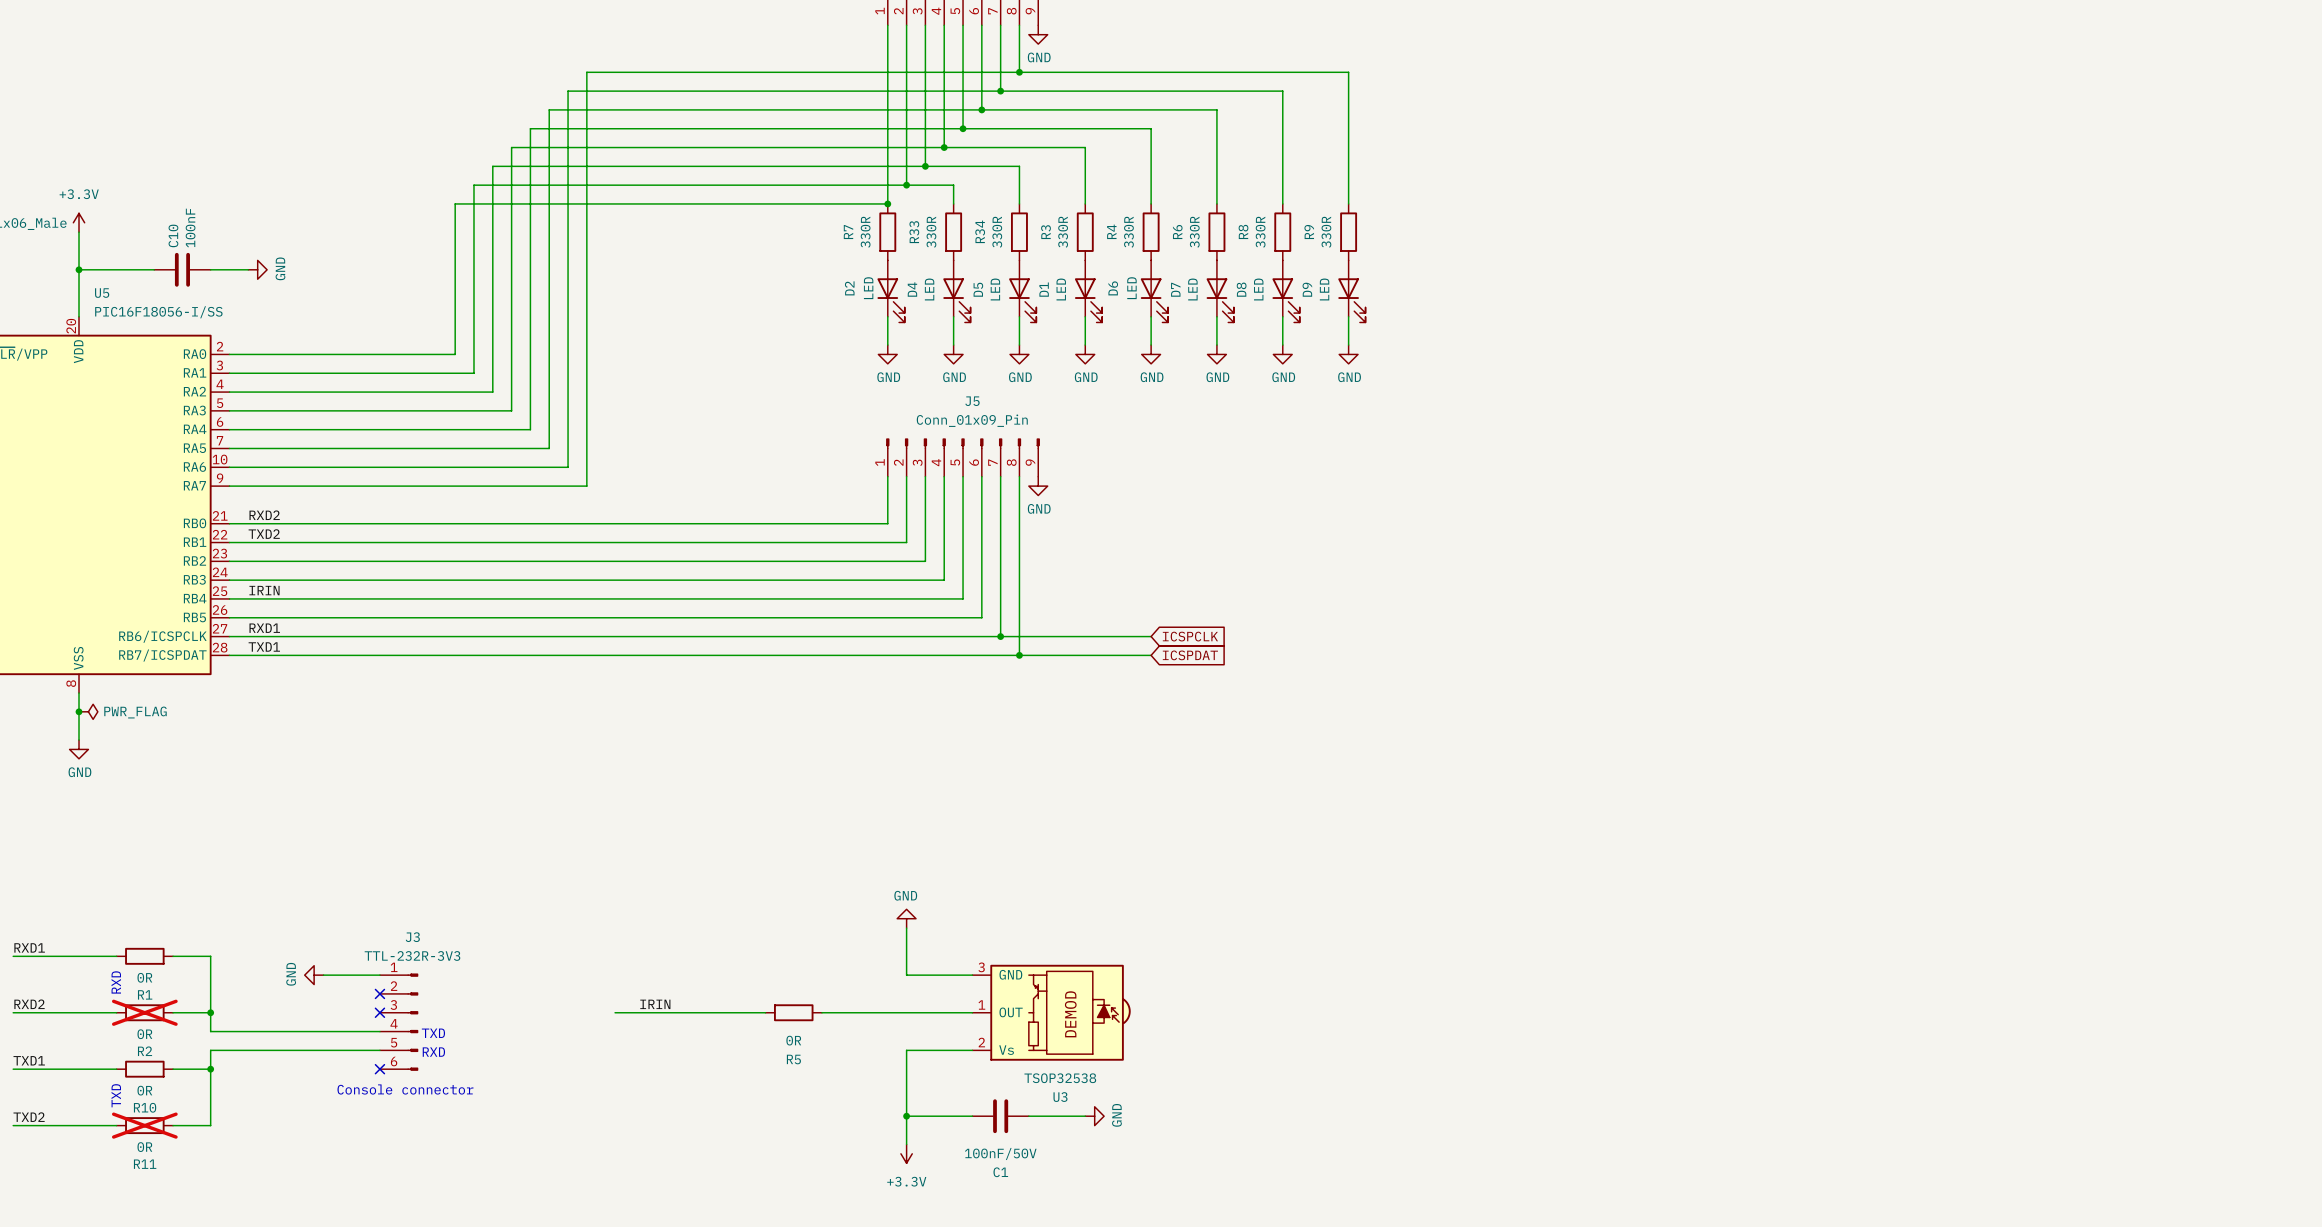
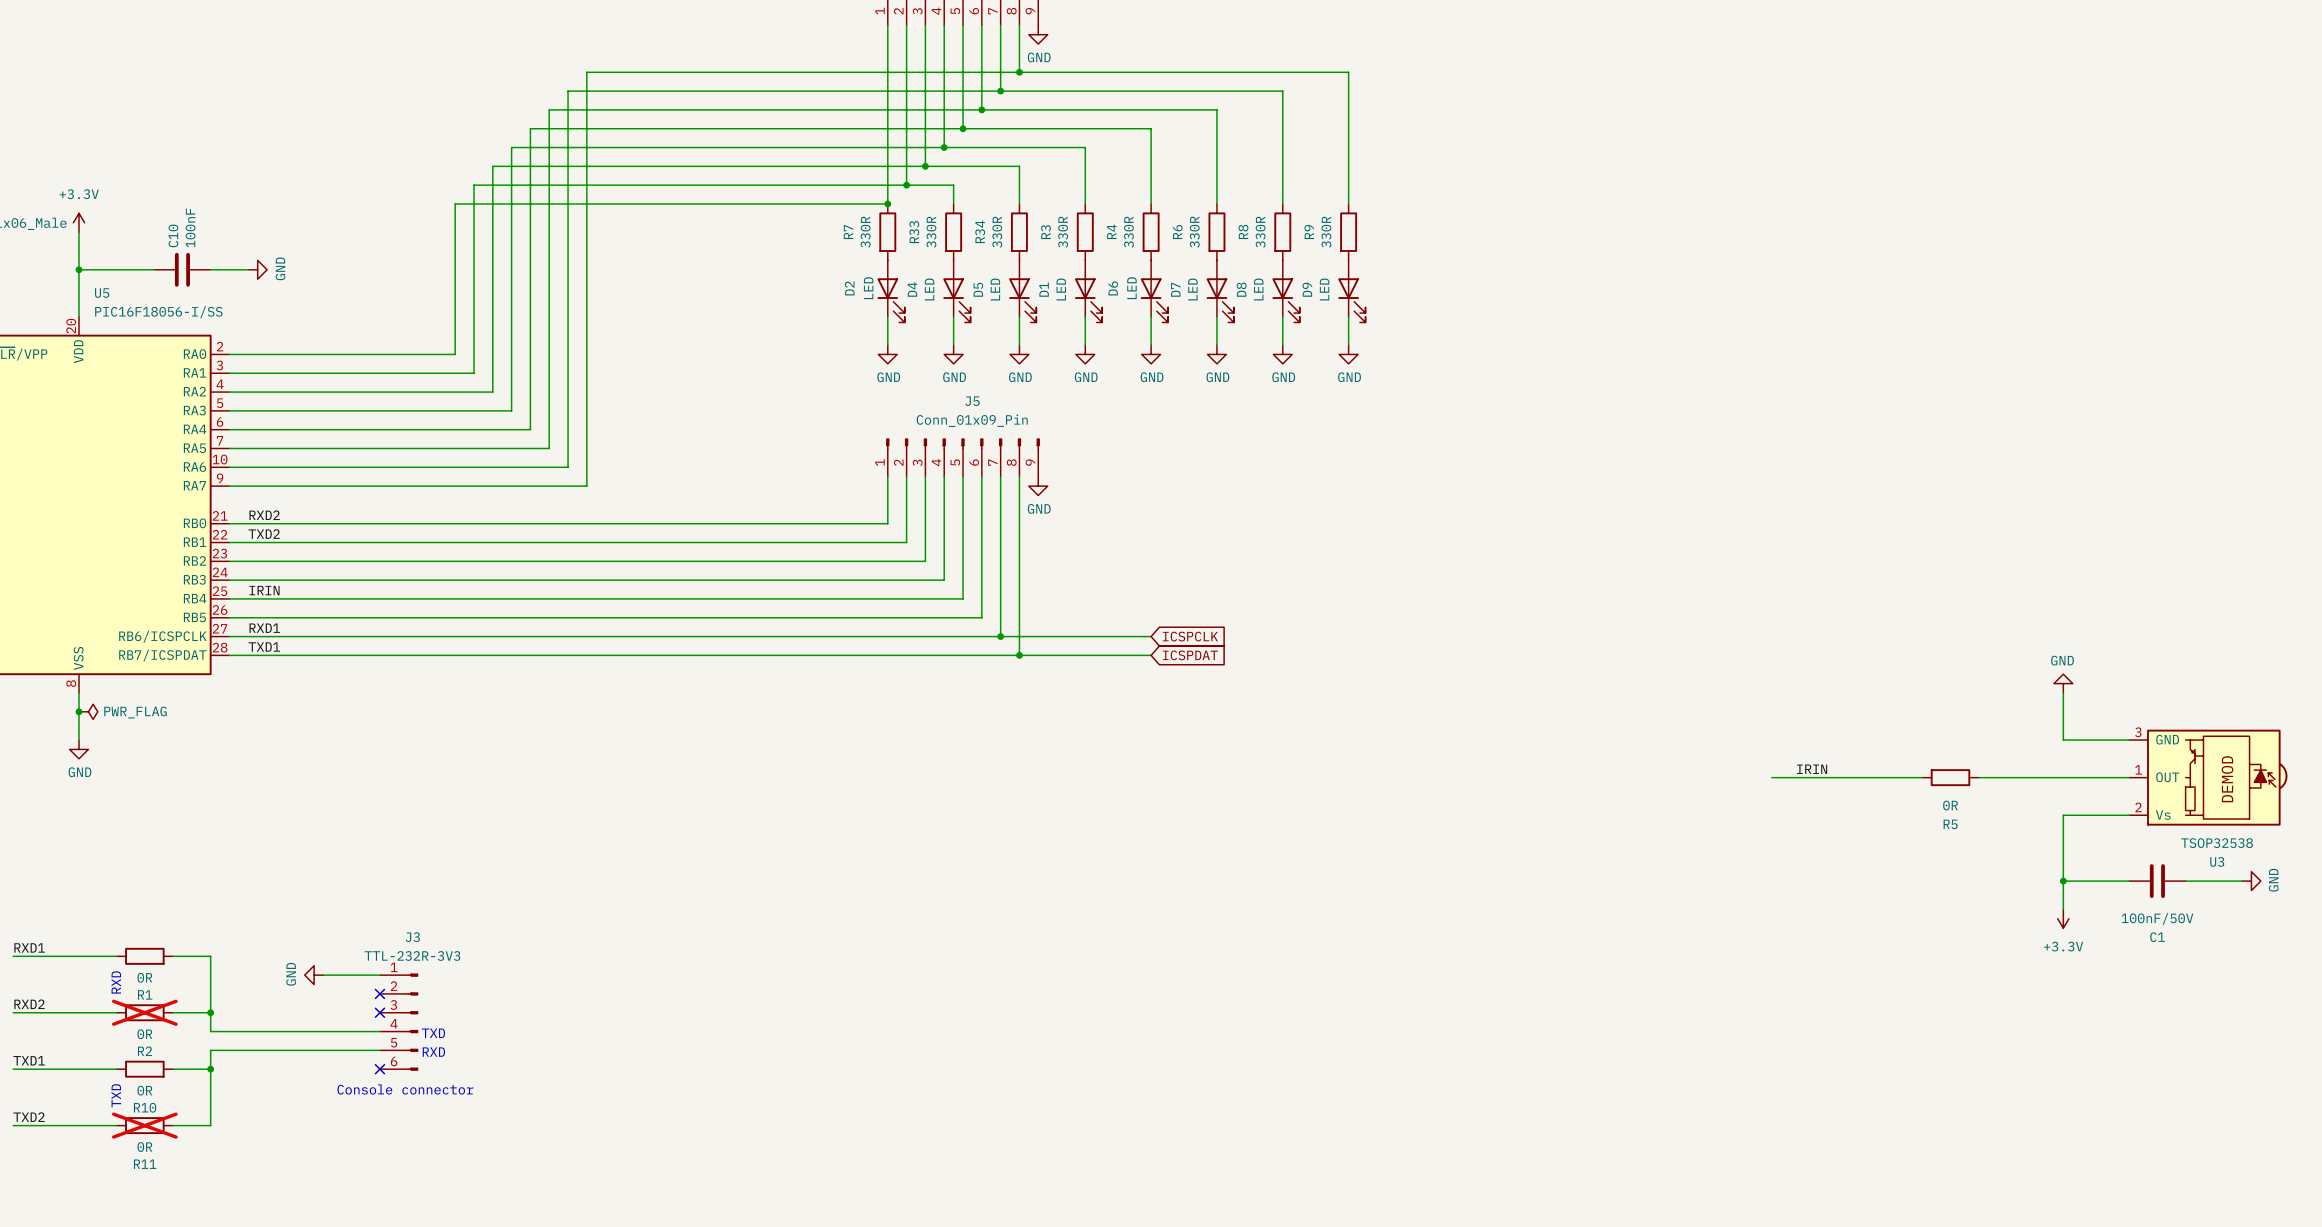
power symbol: none -> GND (2063, 683)
wire: none -> (2063, 693) (2063, 740) (2129, 740)
label: none -> IRIN (1812, 769)
wire: none -> (1771, 777) (1922, 777)
wire: none -> (1978, 777) (2129, 777)
wire: none -> (2129, 815) (2063, 815) (2063, 909)
wire: none -> (2063, 881) (2129, 881)
junction: none -> (2063, 881)
wire: none -> (2185, 881) (2242, 881)
power symbol: none -> GND (2251, 881)
power symbol: GND (906, 918) -> none
power symbol: none -> +3.3V (2063, 918)
wire: (906, 928) (906, 975) (972, 975) -> none
label: IRIN (655, 1004) -> none
wire: (615, 1012) (765, 1012) -> none
R5 position: (793, 1012) -> (1950, 777)
wire: (821, 1012) (972, 1012) -> none
U3 position: (1051, 1012) -> (2208, 777)
wire: (972, 1050) (906, 1050) (906, 1144) -> none
wire: (906, 1116) (972, 1116) -> none
junction: (906, 1116) -> none
C1 position: (1000, 1116) -> (2157, 881)
wire: (1028, 1116) (1085, 1116) -> none
power symbol: GND (1094, 1116) -> none
power symbol: +3.3V (906, 1153) -> none

